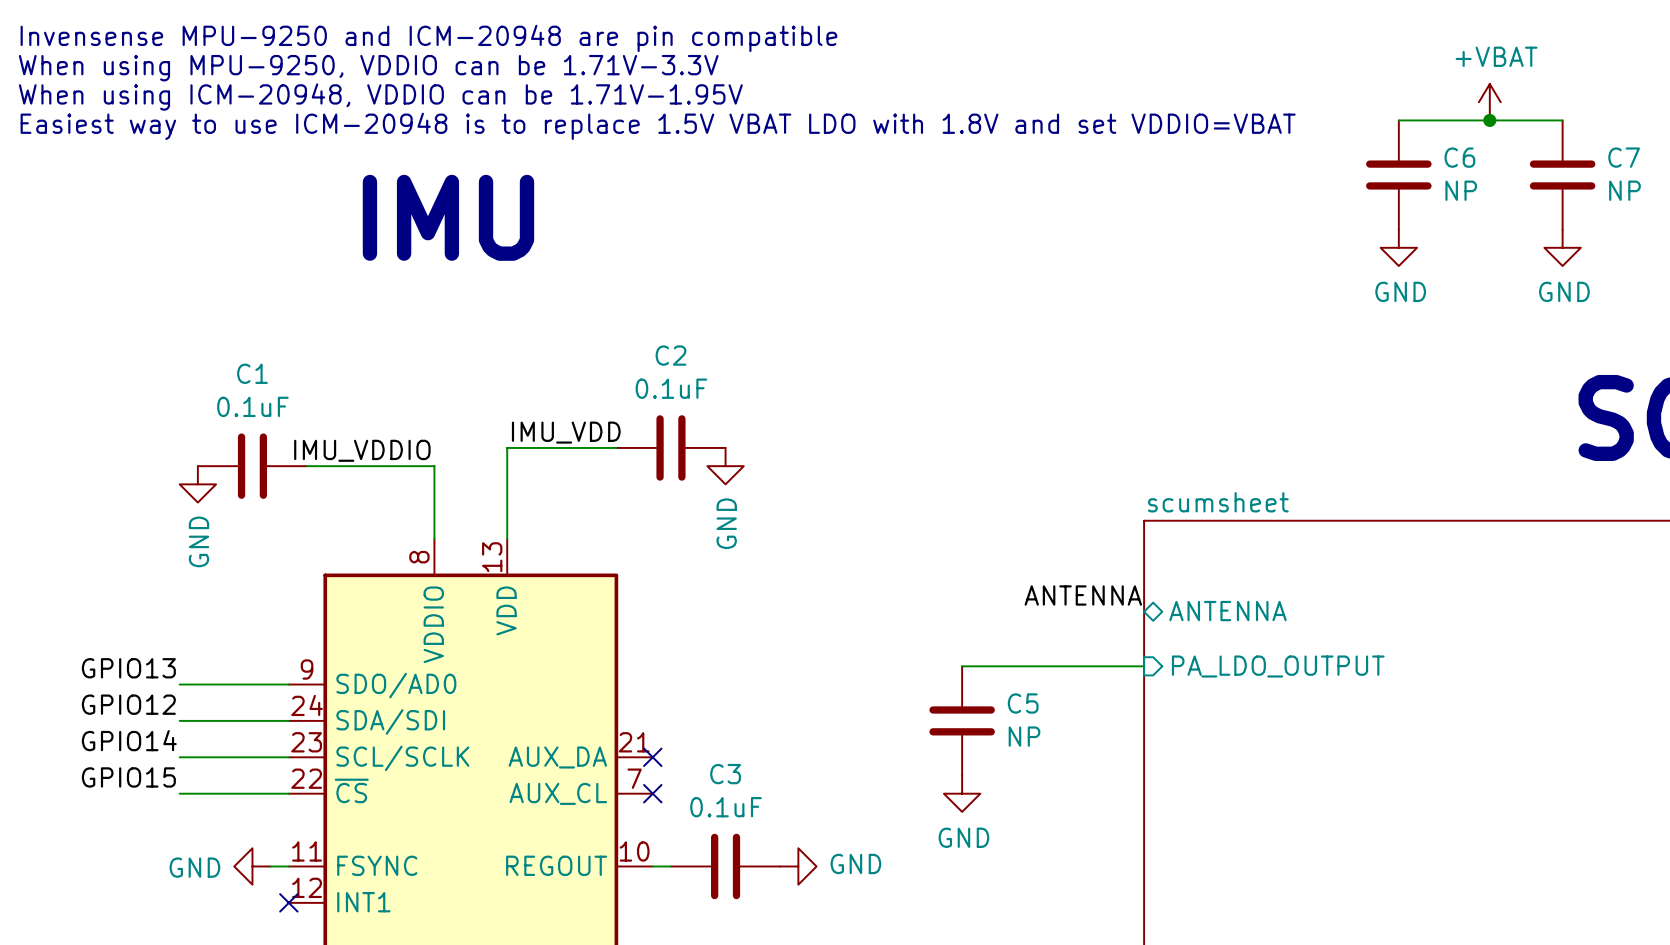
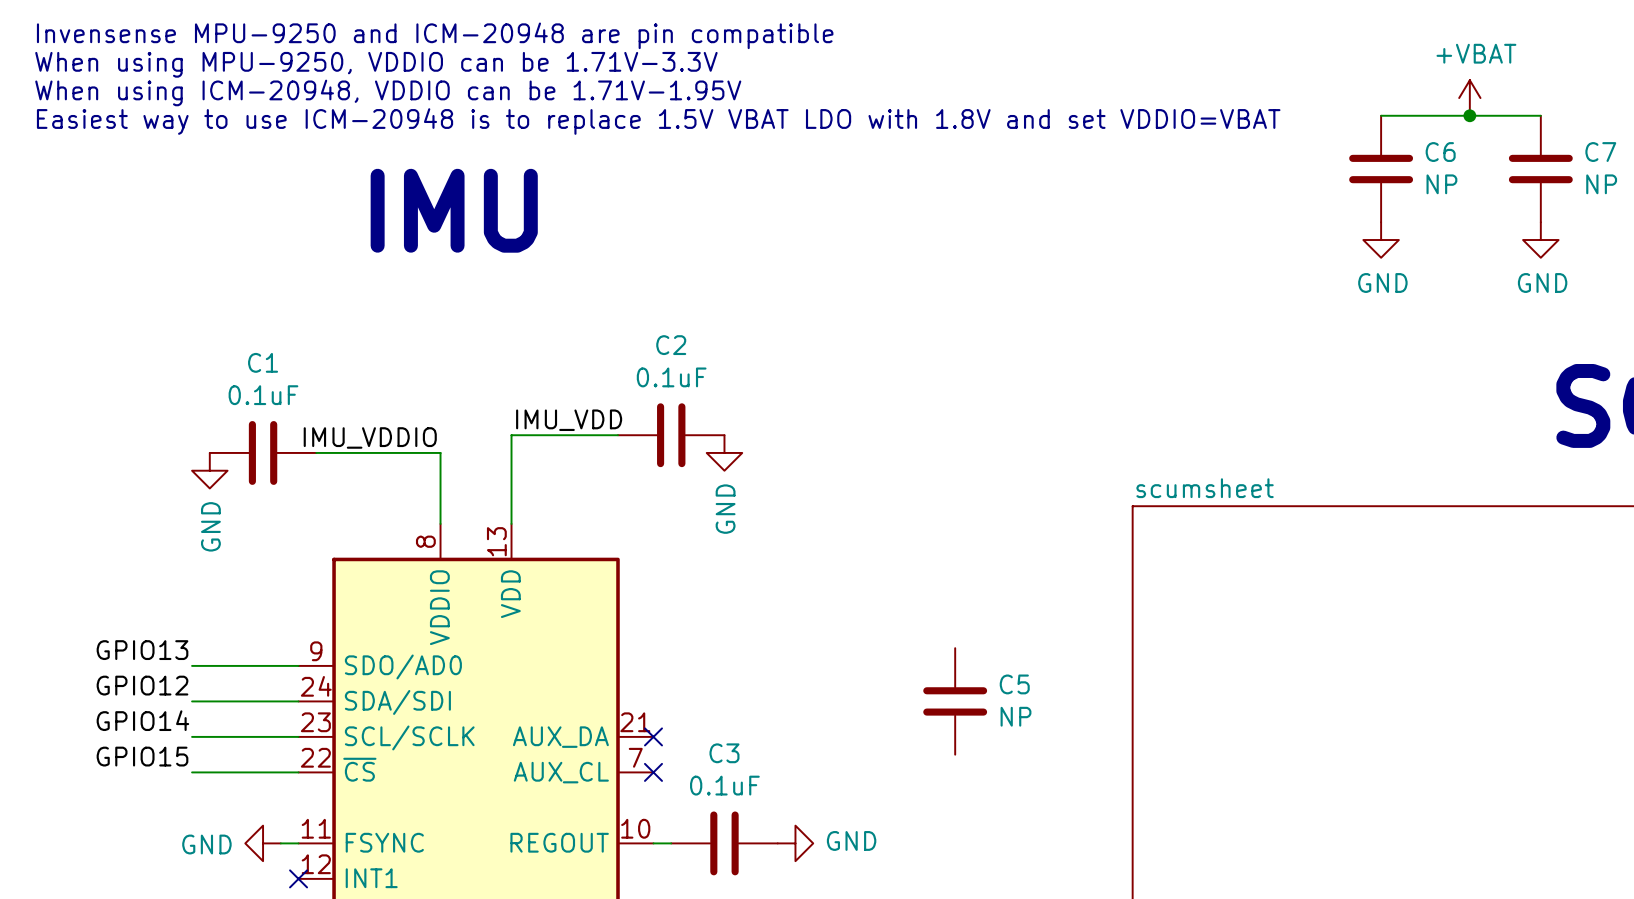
label: ANTENNA (1083, 595) -> none
sheet pin: ANTENNA (1227, 611) -> none
wire: (962, 666) (1144, 666) -> none
sheet pin: PA_LDO_OUTPUT (1278, 666) -> none
power symbol: GND (962, 793) -> none

